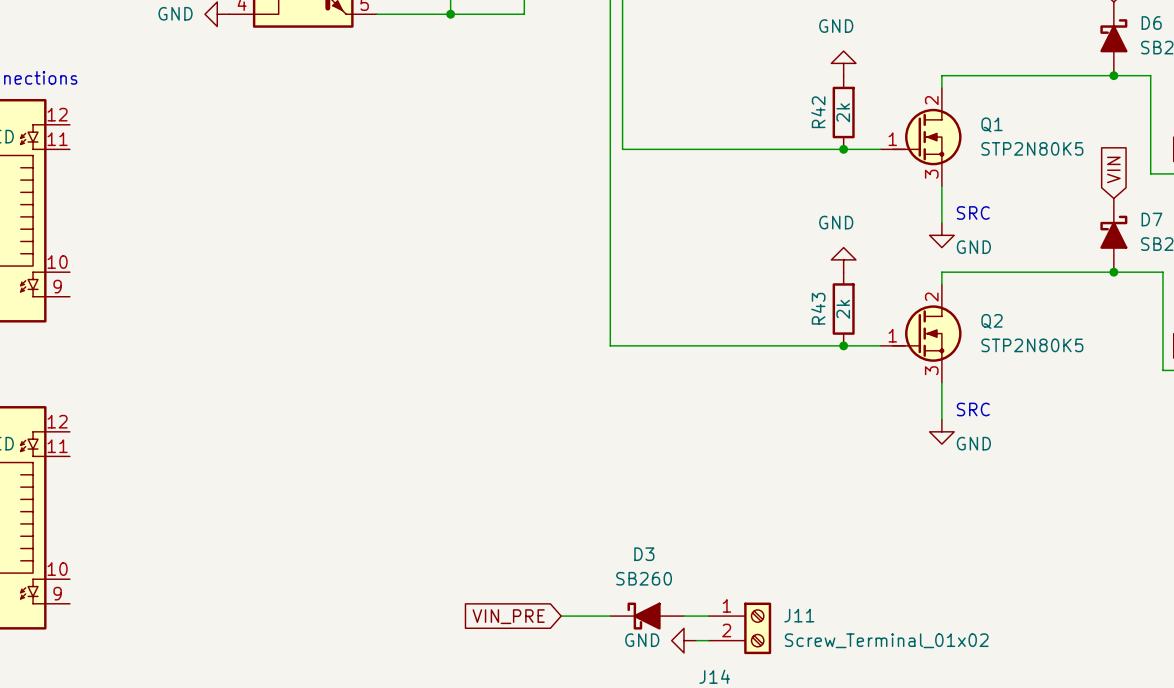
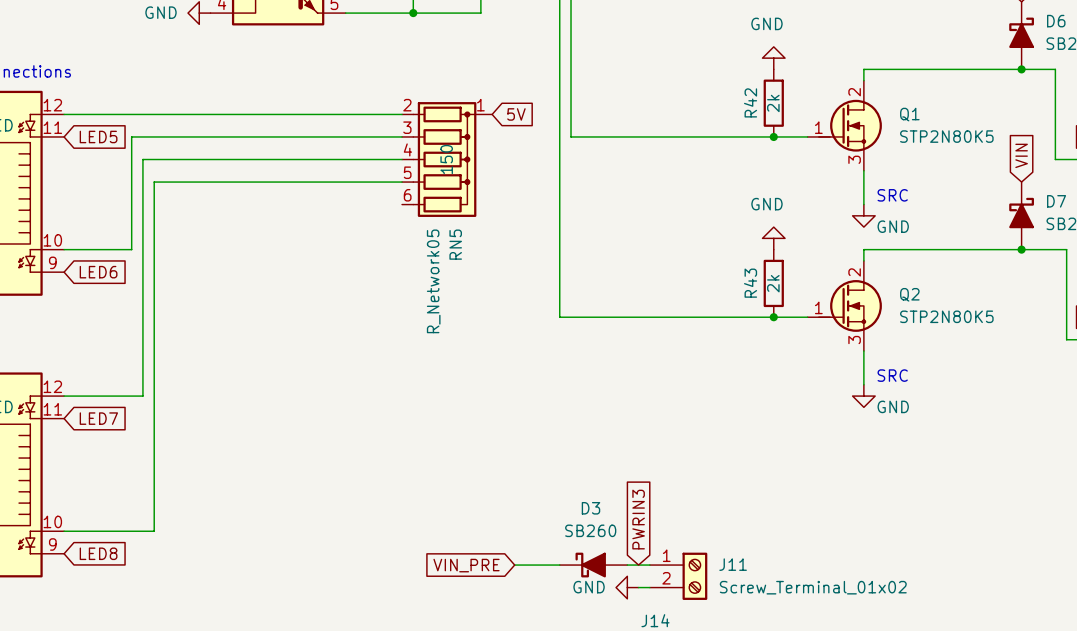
wire: none -> (64, 114) (402, 114)
global label: none -> 5V (516, 114)
global label: none -> LED5 (98, 136)
wire: none -> (402, 136) (131, 136) (131, 249) (64, 249)
wire: none -> (402, 159) (142, 159) (142, 396) (64, 396)
RN5: none -> R_Network05 (447, 159)
wire: none -> (402, 182) (154, 182) (154, 531) (64, 531)
global label: none -> LED6 (98, 272)
global label: none -> LED7 (98, 418)
global label: none -> PWRIN3 (638, 519)
global label: none -> LED8 (98, 553)

